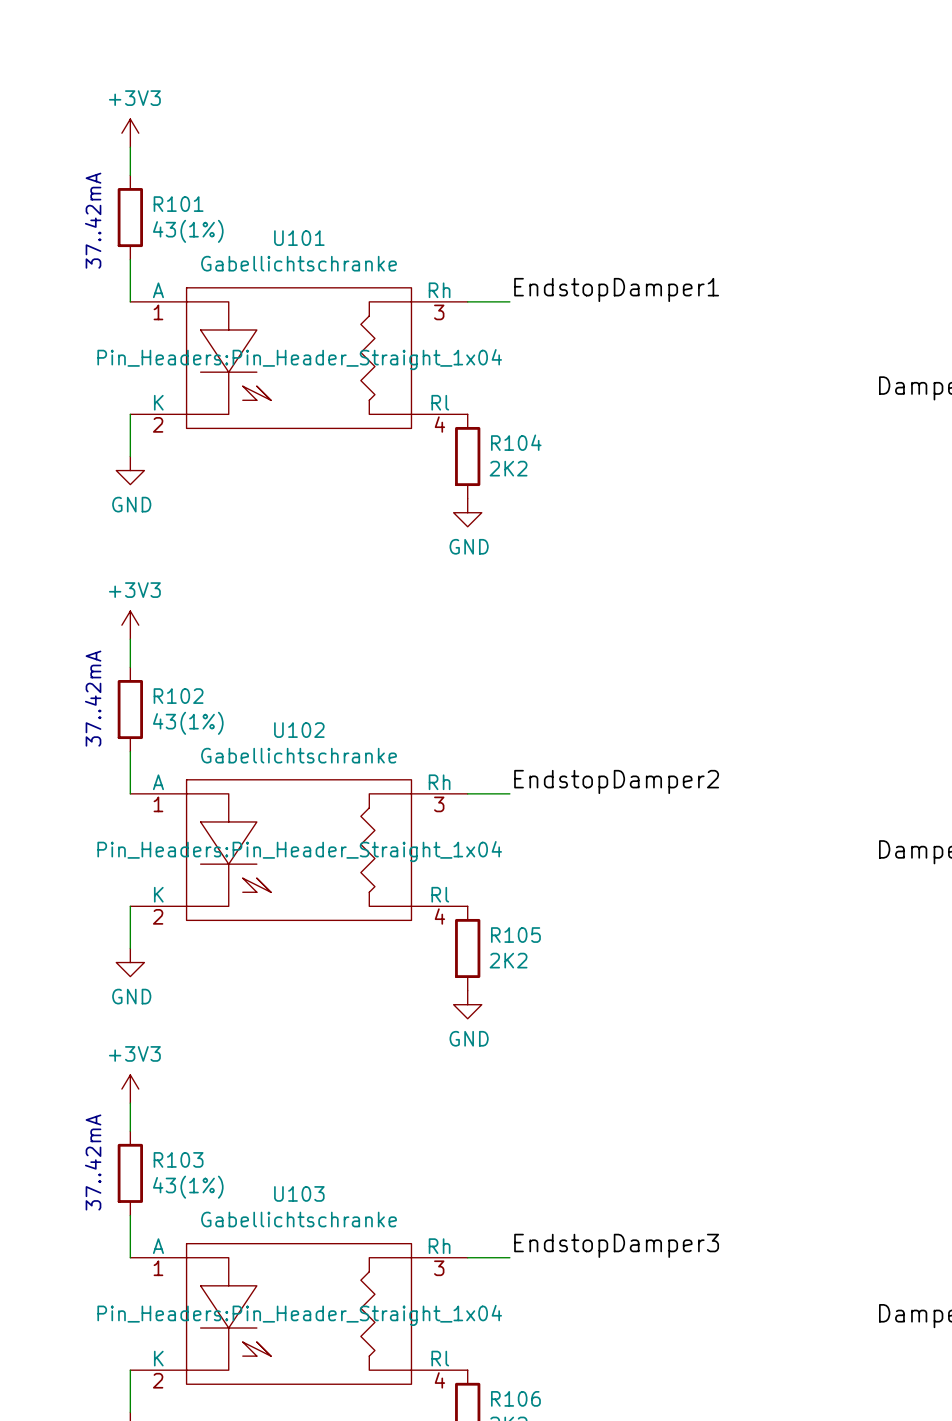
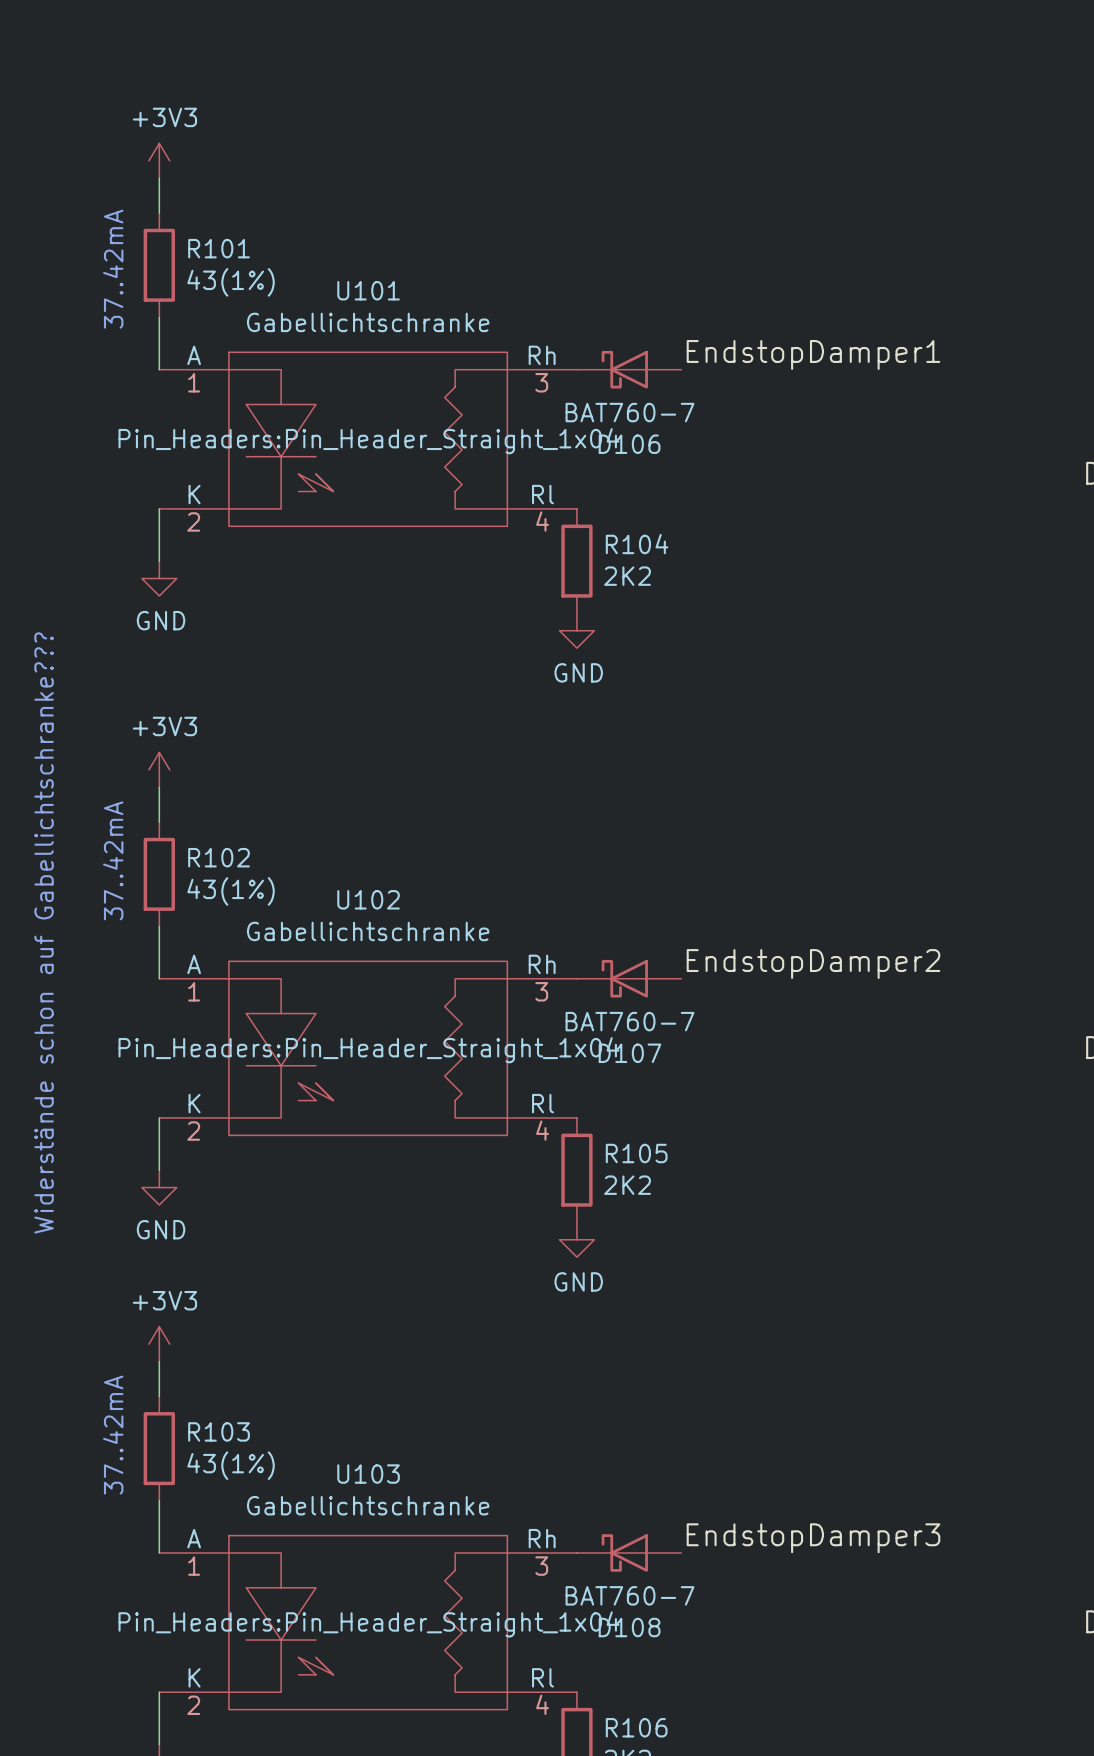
label position: EndstopDamper1 (616, 289) -> EndstopDamper1 (813, 354)
D106: none -> BAT760-7 (629, 369)
text: none -> Widerstände schon auf Gabellichtschranke??? (44, 932)
label position: EndstopDamper2 (616, 781) -> EndstopDamper2 (813, 964)
D107: none -> BAT760-7 (629, 978)
label position: EndstopDamper3 (616, 1245) -> EndstopDamper3 (813, 1538)
D108: none -> BAT760-7 (629, 1553)

